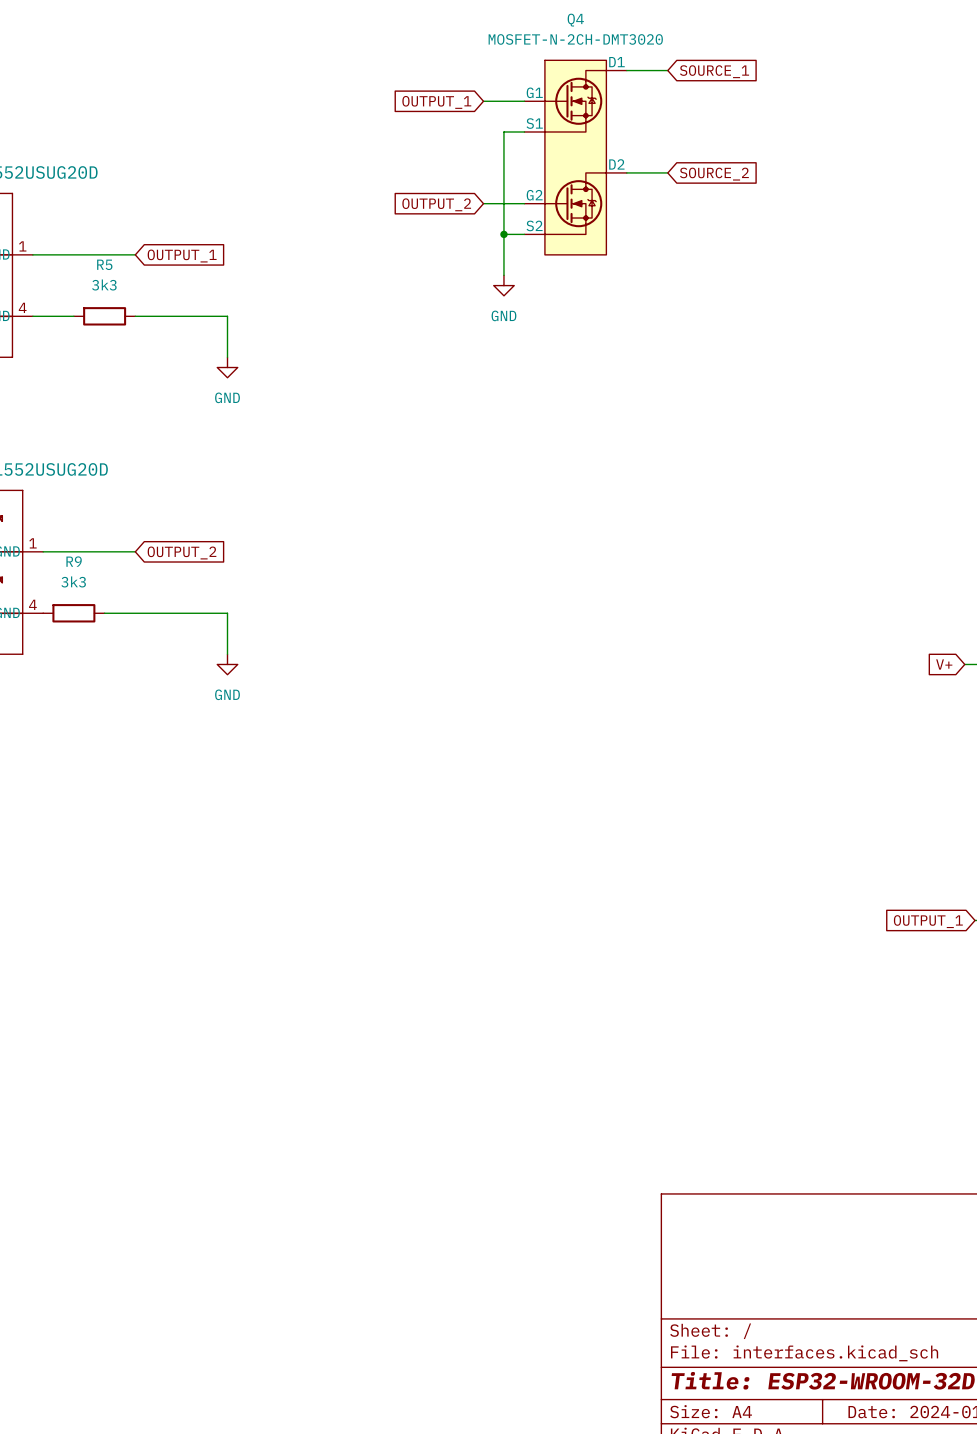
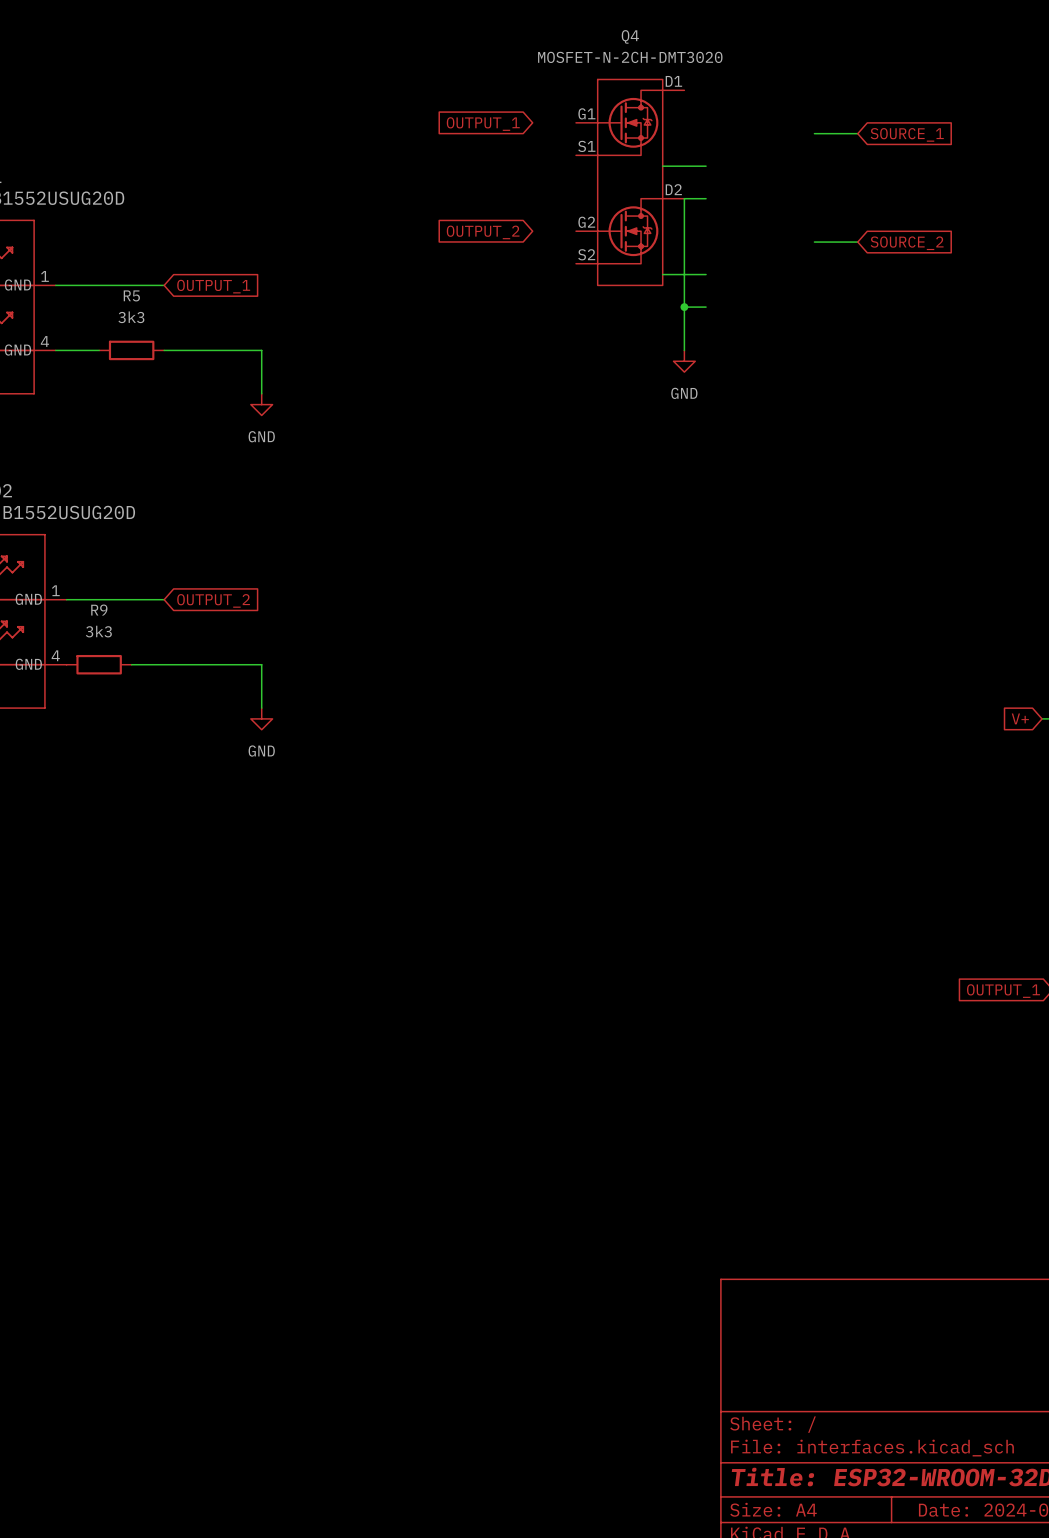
wire: (626, 70) (667, 70) -> (814, 133) (857, 133)
global label position: SOURCE_1 (714, 71) -> SOURCE_1 (907, 134)
wire: (483, 101) (524, 101) -> (662, 166) (706, 166)
wire: (524, 131) (503, 131) (503, 275) -> none
wire: none -> (684, 198) (684, 350)
wire: (647, 172) (667, 172) -> none
global label position: SOURCE_2 (714, 174) -> SOURCE_2 (907, 243)
wire: (483, 203) (524, 203) -> (662, 274) (706, 274)
wire: none -> (814, 242) (857, 242)
wire: (503, 234) (524, 234) -> (684, 307) (706, 307)
junction: (503, 234) -> none
junction: none -> (684, 307)
power symbol position: GND (503, 285) -> GND (684, 361)

